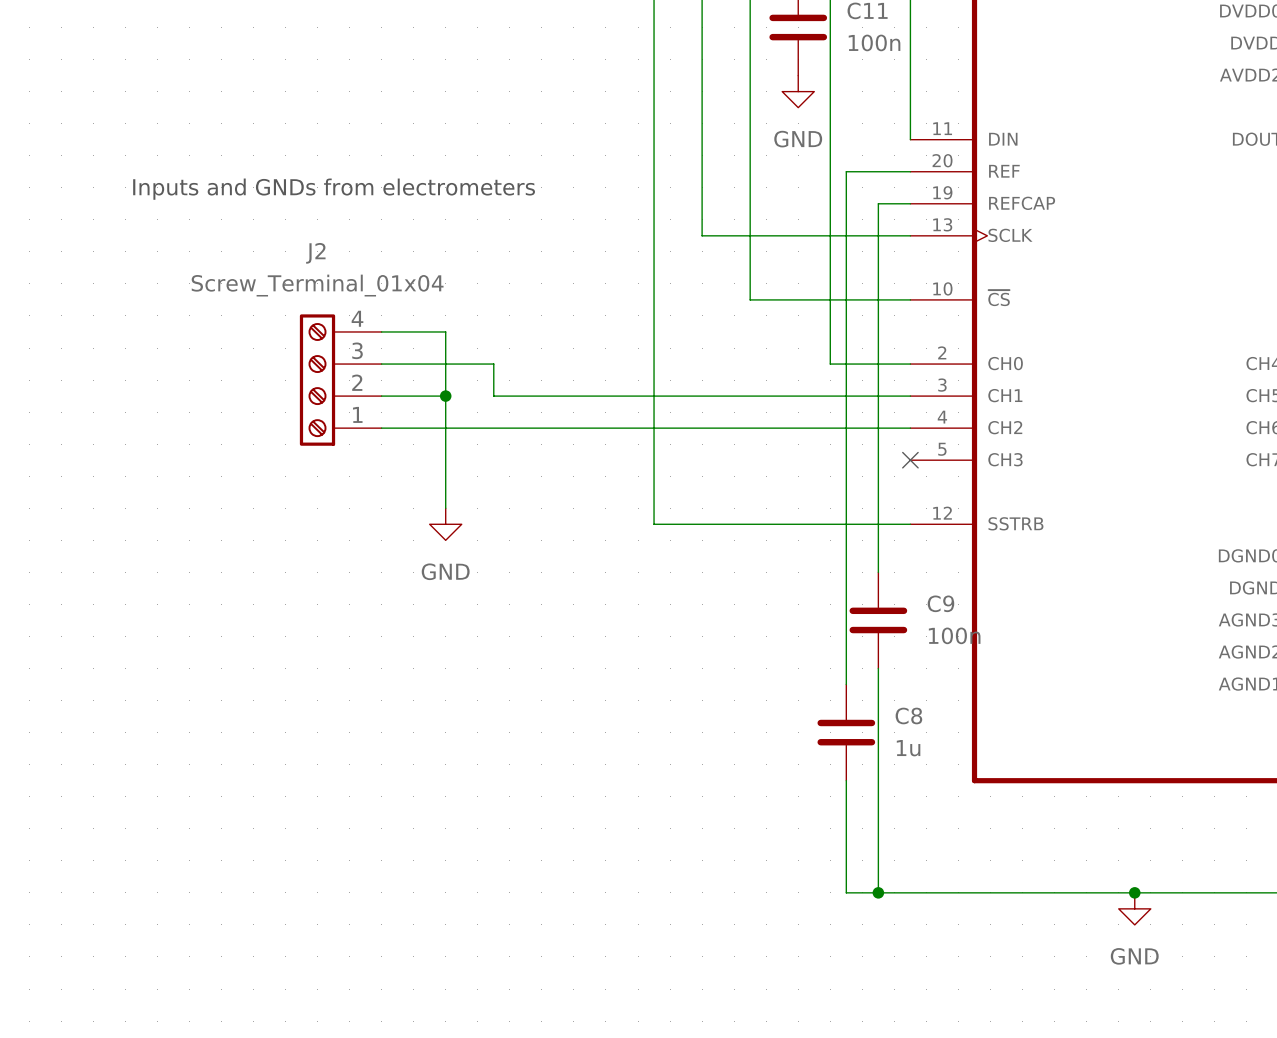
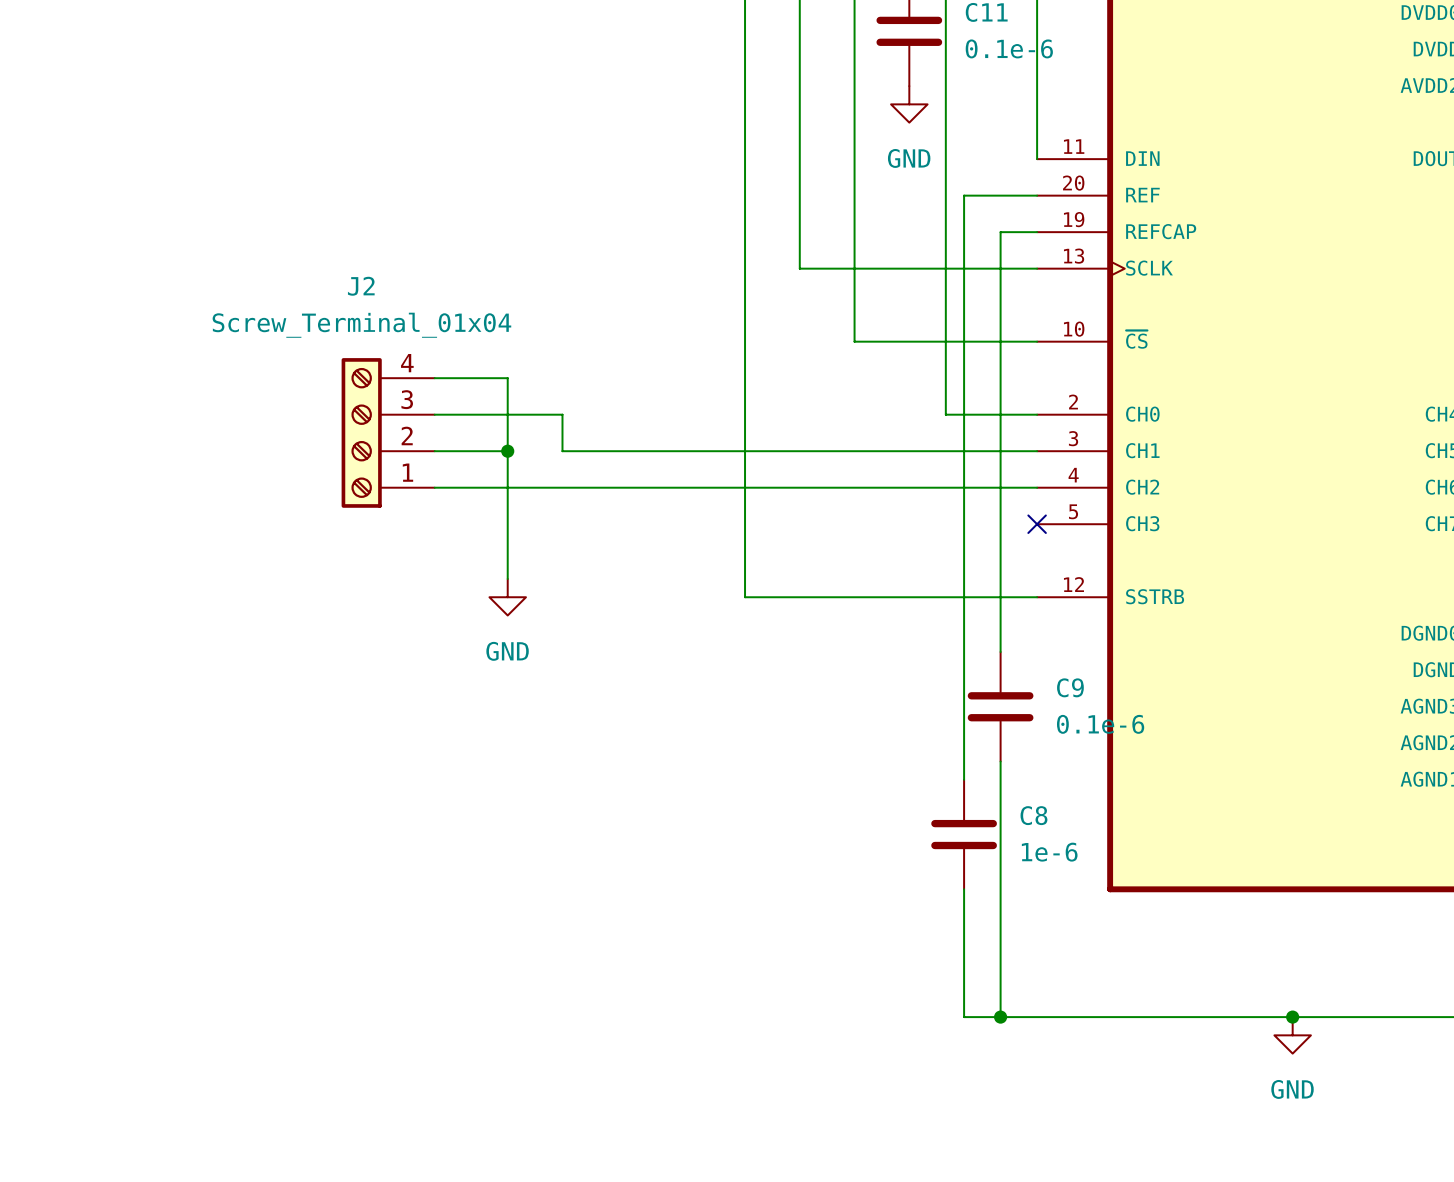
C11 value: 100n (874, 42) -> 0.1e-6 (1009, 48)
text: Inputs and GNDs from electrometers (334, 189) -> none
C9 value: 100n (954, 635) -> 0.1e-6 (1100, 724)
C8 value: 1u (908, 748) -> 1e-6 (1049, 852)

